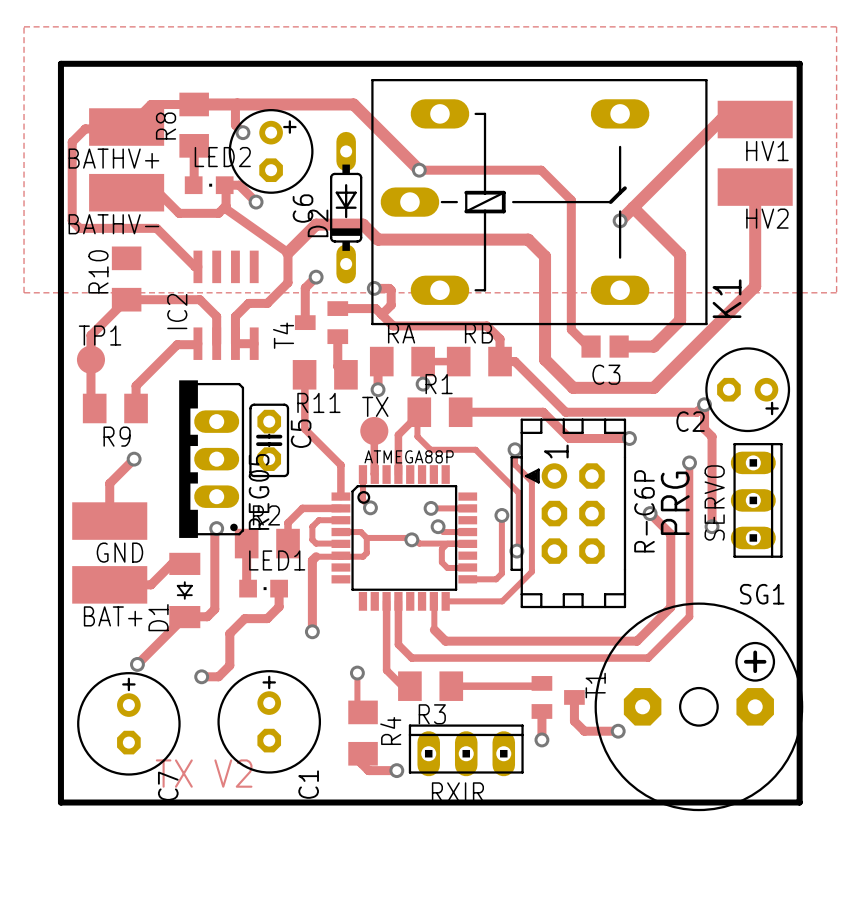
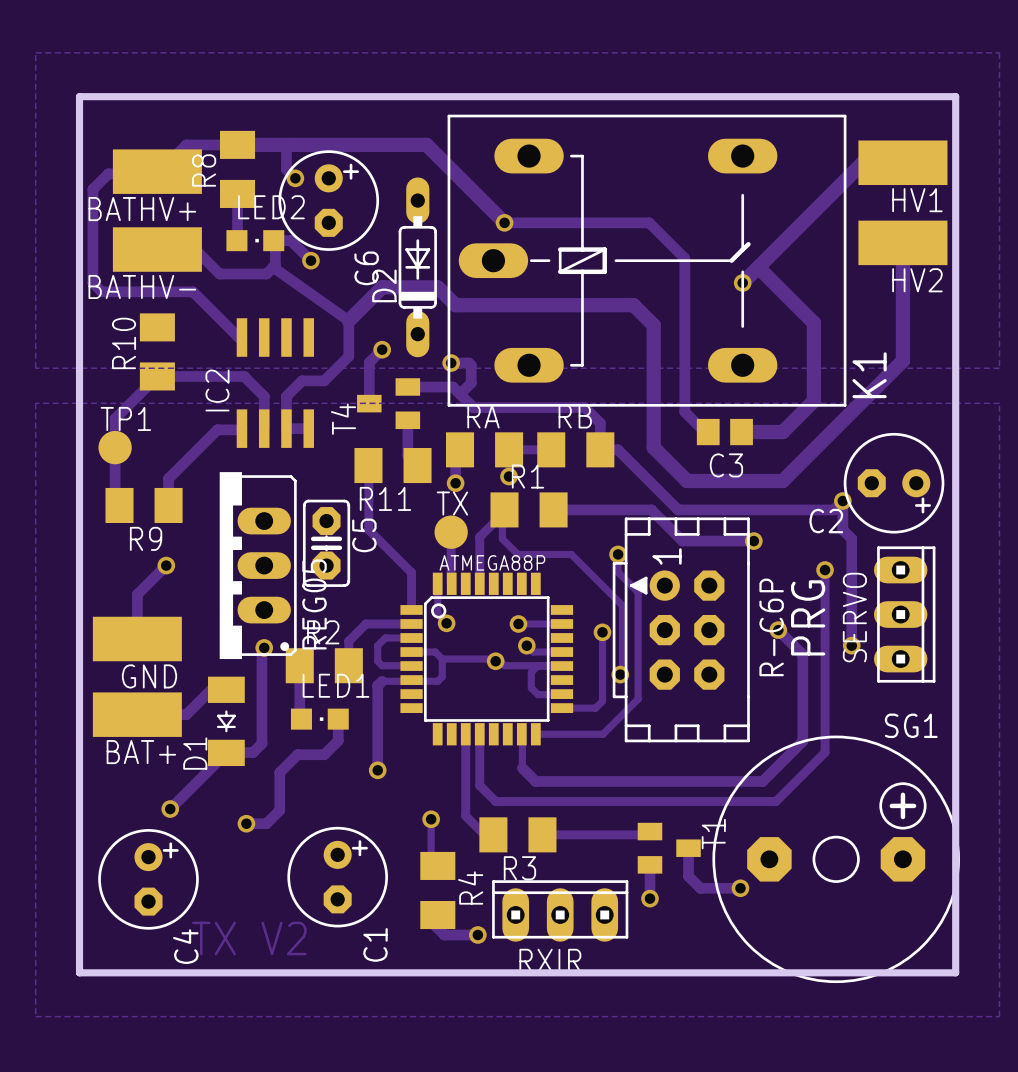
zone outline: none -> (35, 403) (35, 1016) (999, 1016) (999, 403) (35, 403)
C1 footprint: [217, 670, 322, 774] -> [287, 826, 388, 928]
C4: none -> (148, 879)
C7: (128, 723) -> none

